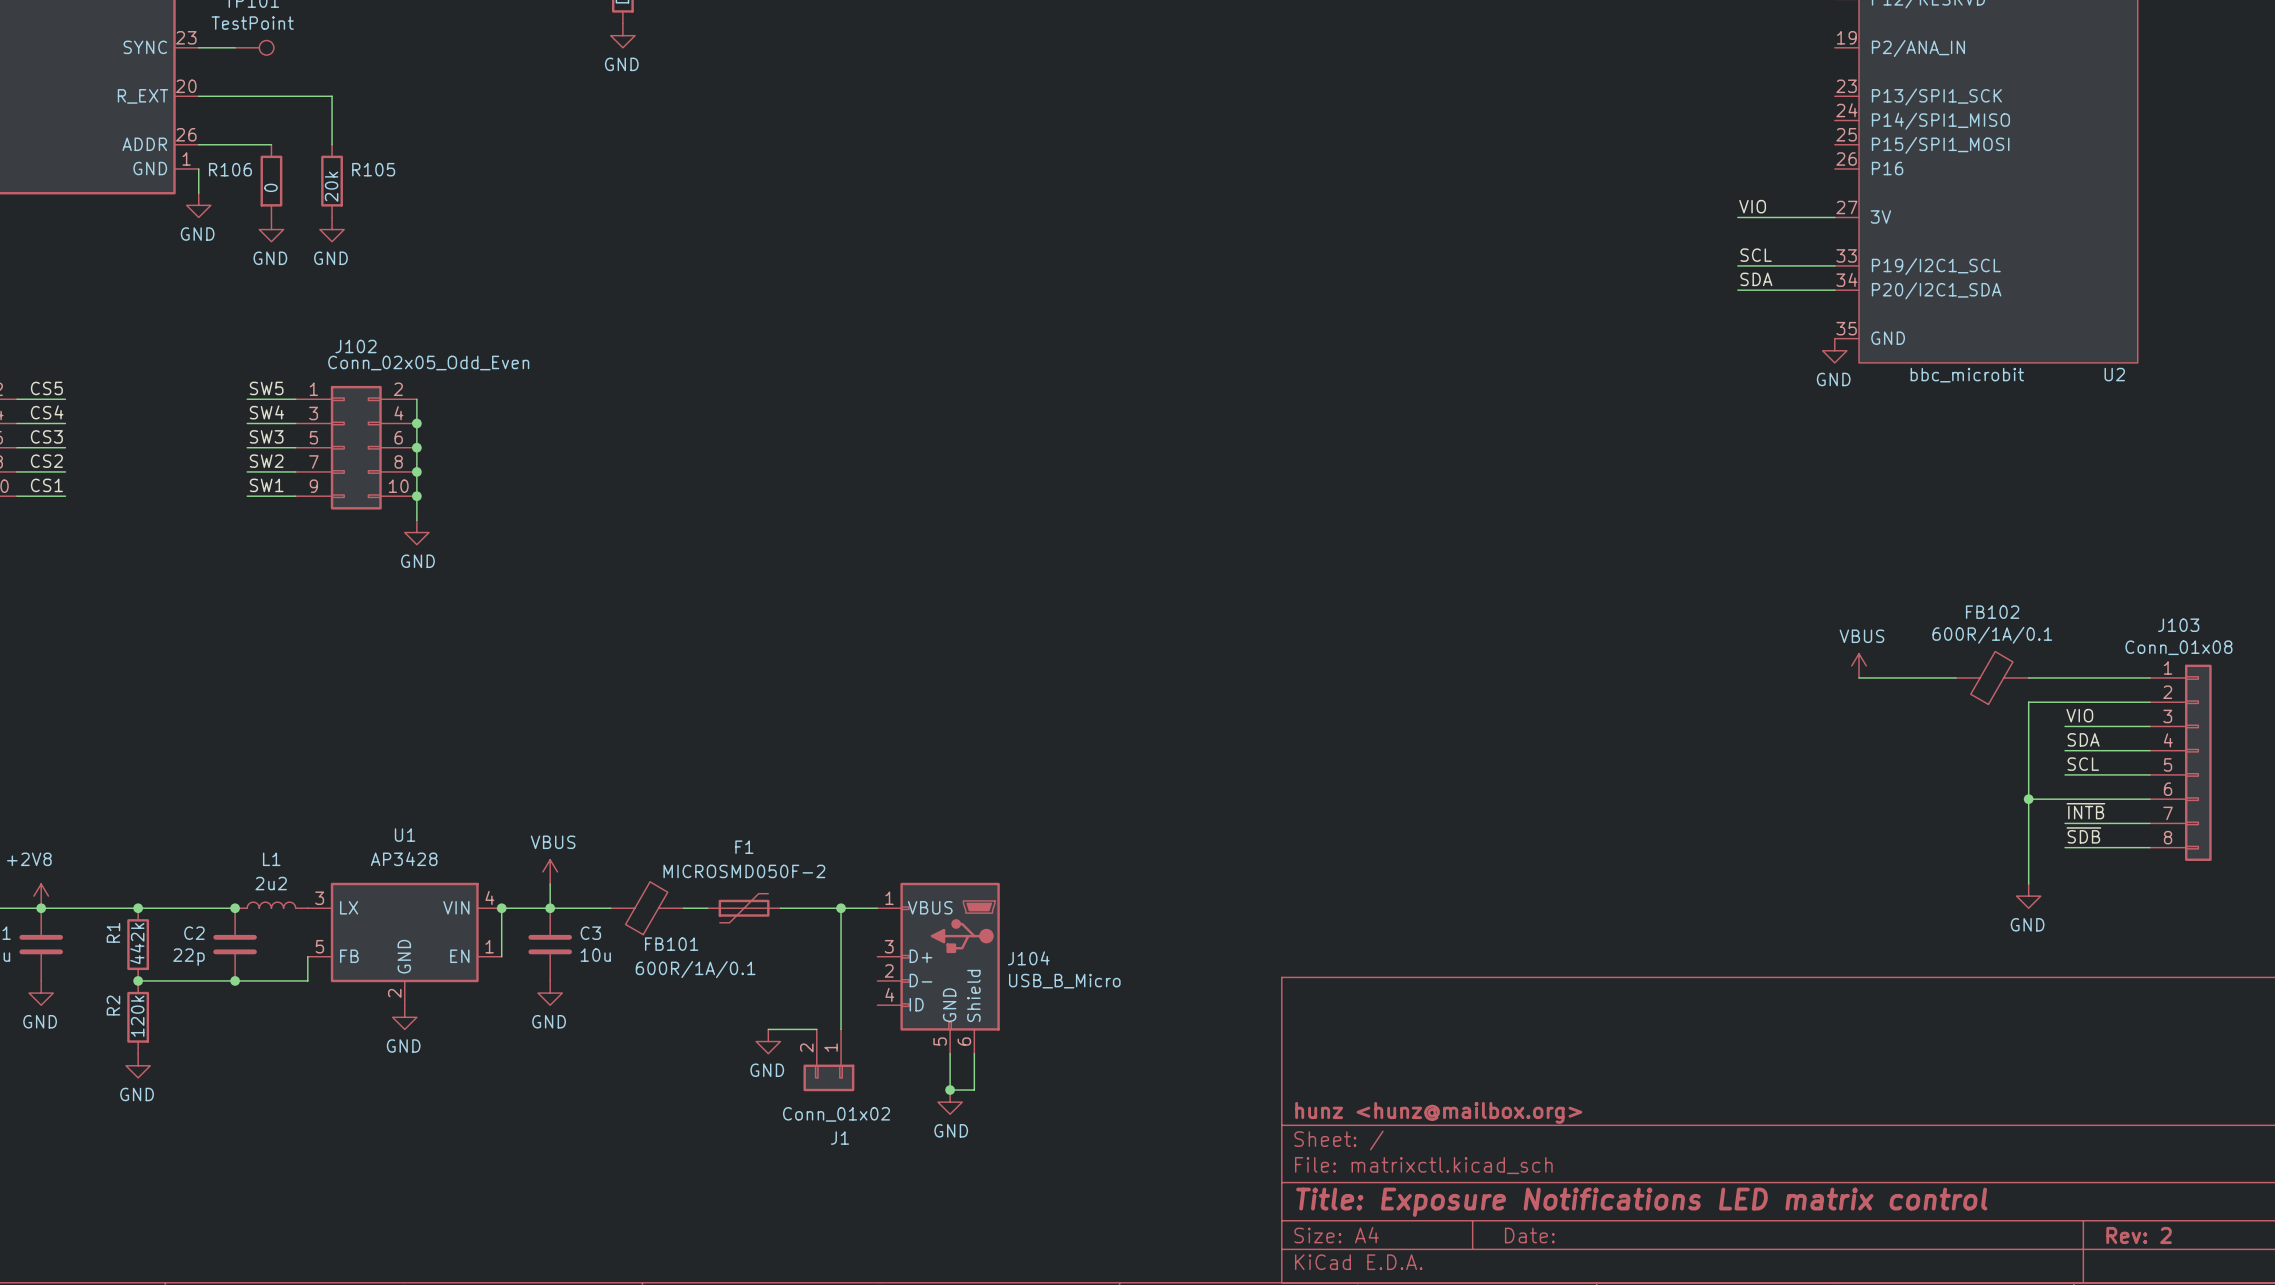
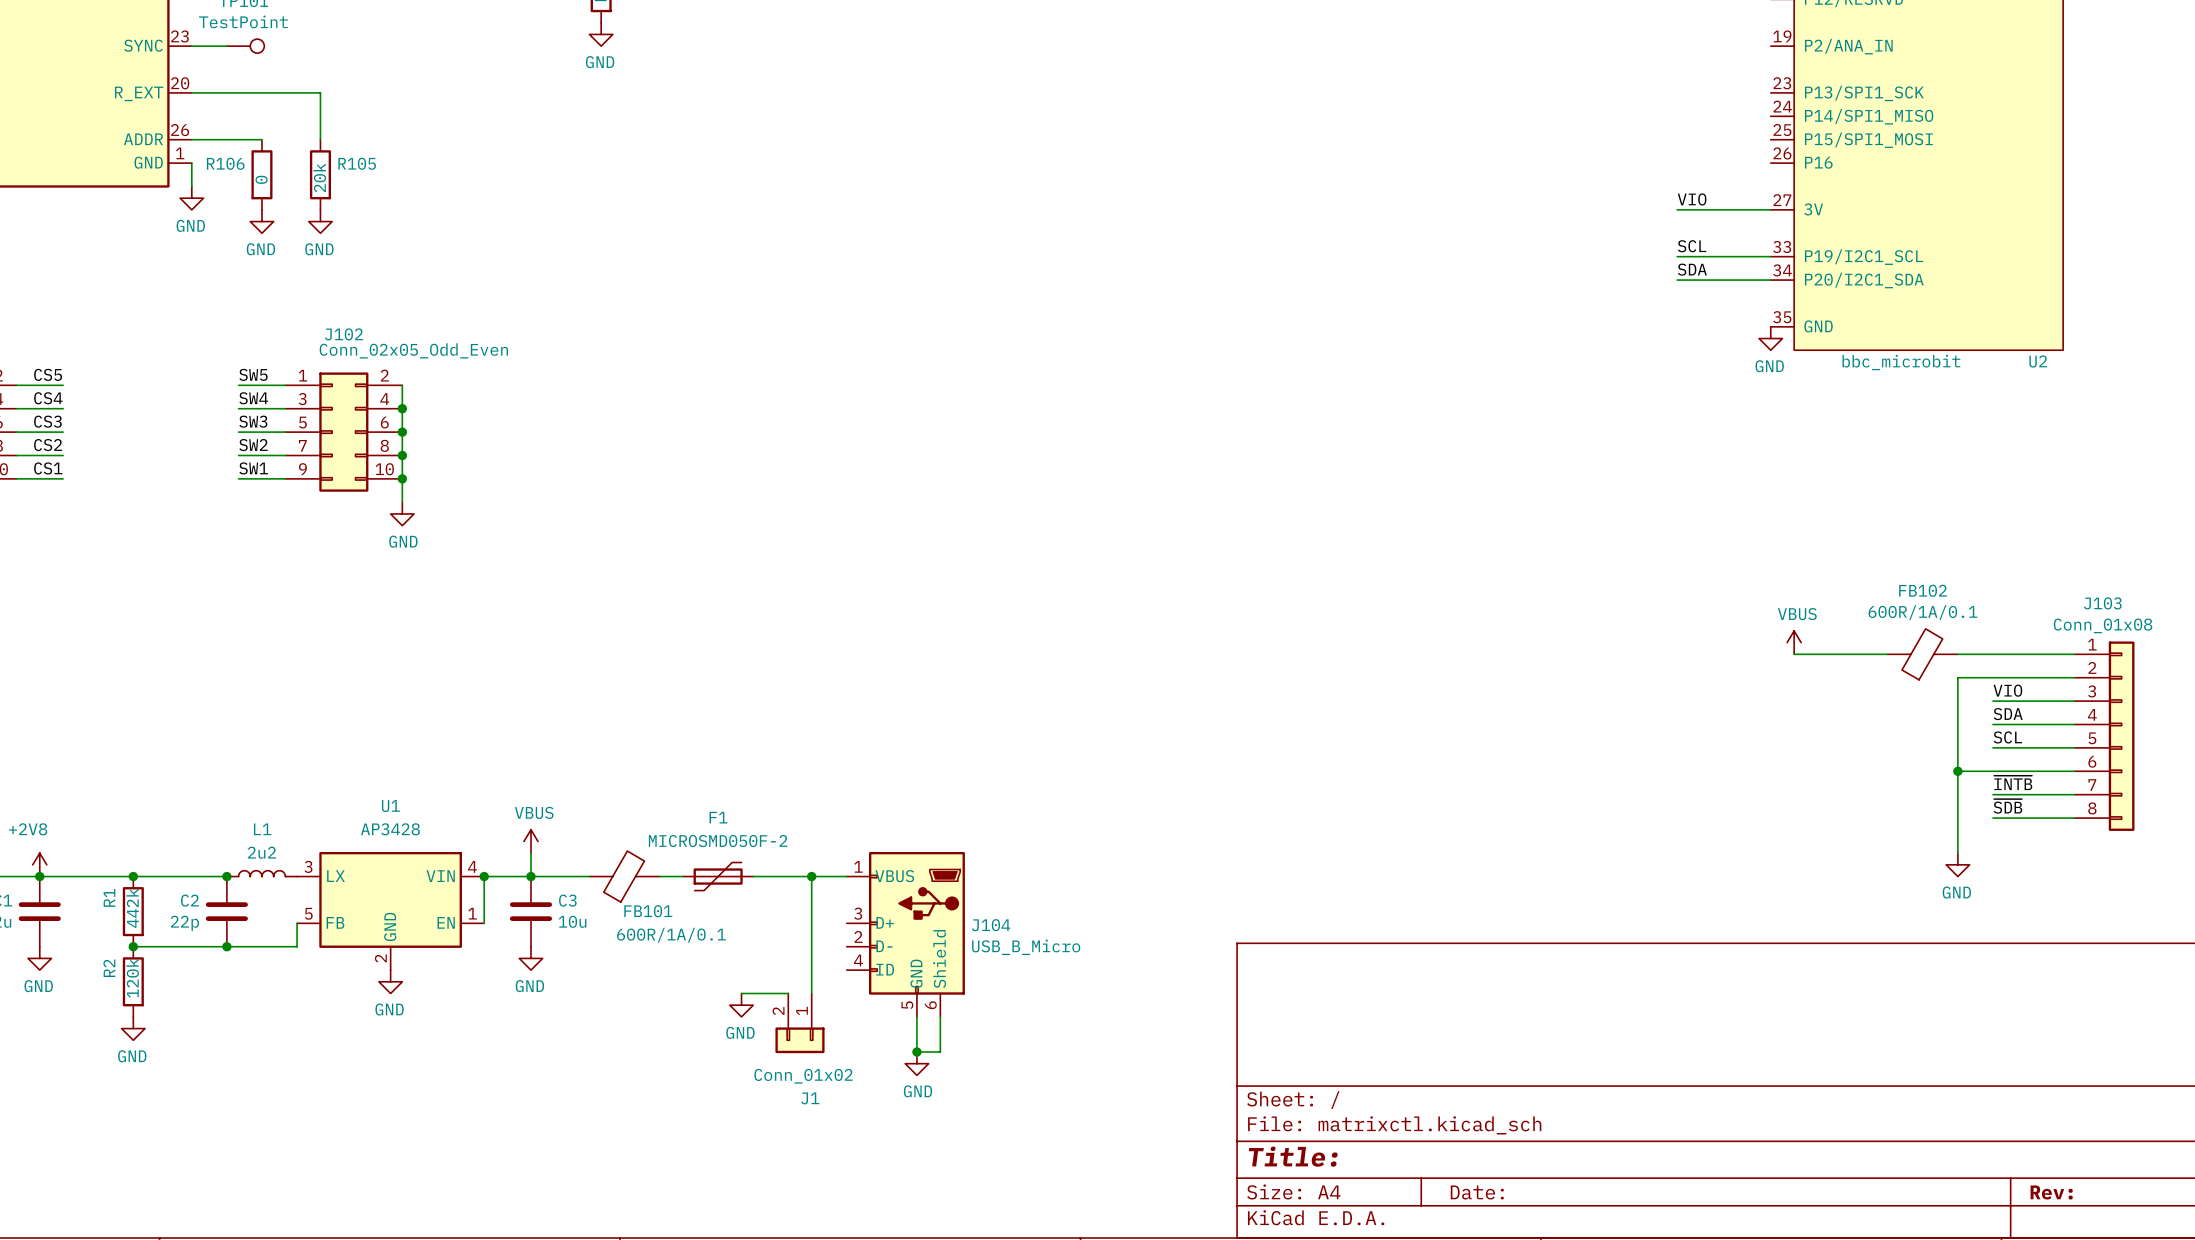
title block: hunz <hunz@mailbox.org> (1438, 1112) -> none
title block: Title: Exposure Notifications LED matrix control (1641, 1202) -> Title: (1293, 1156)
title block: Rev: 2 (2139, 1235) -> Rev: (2051, 1192)

